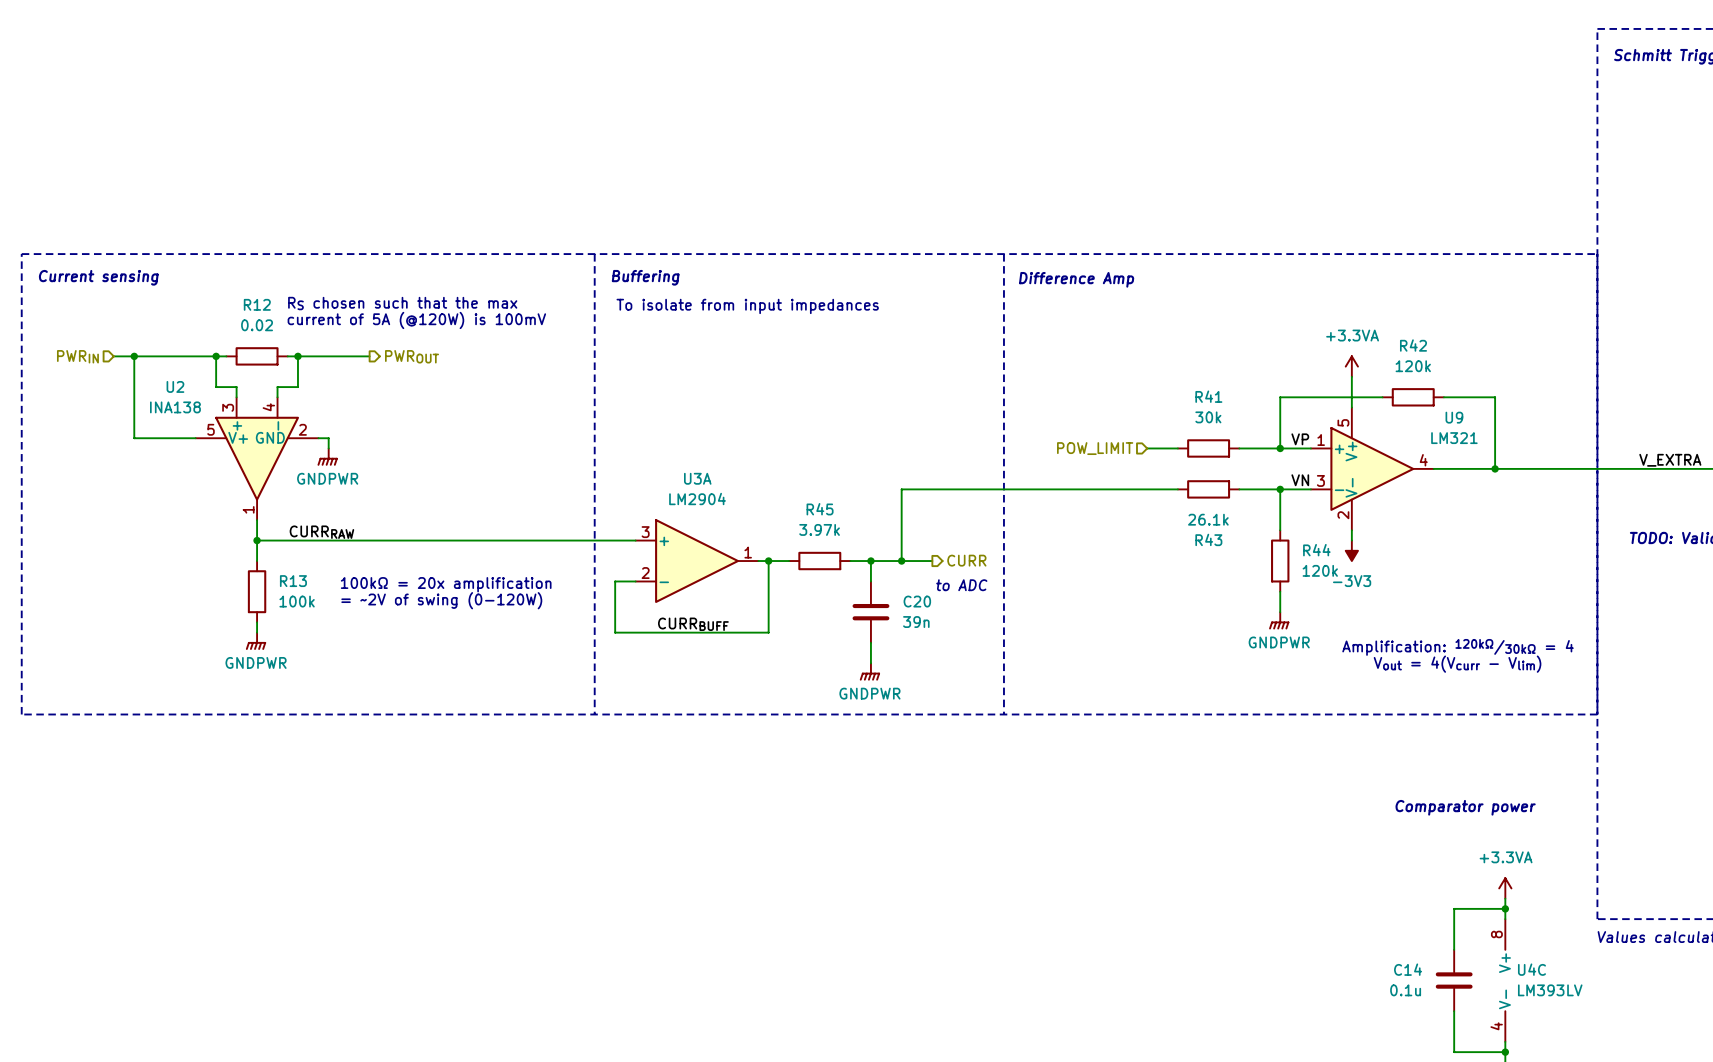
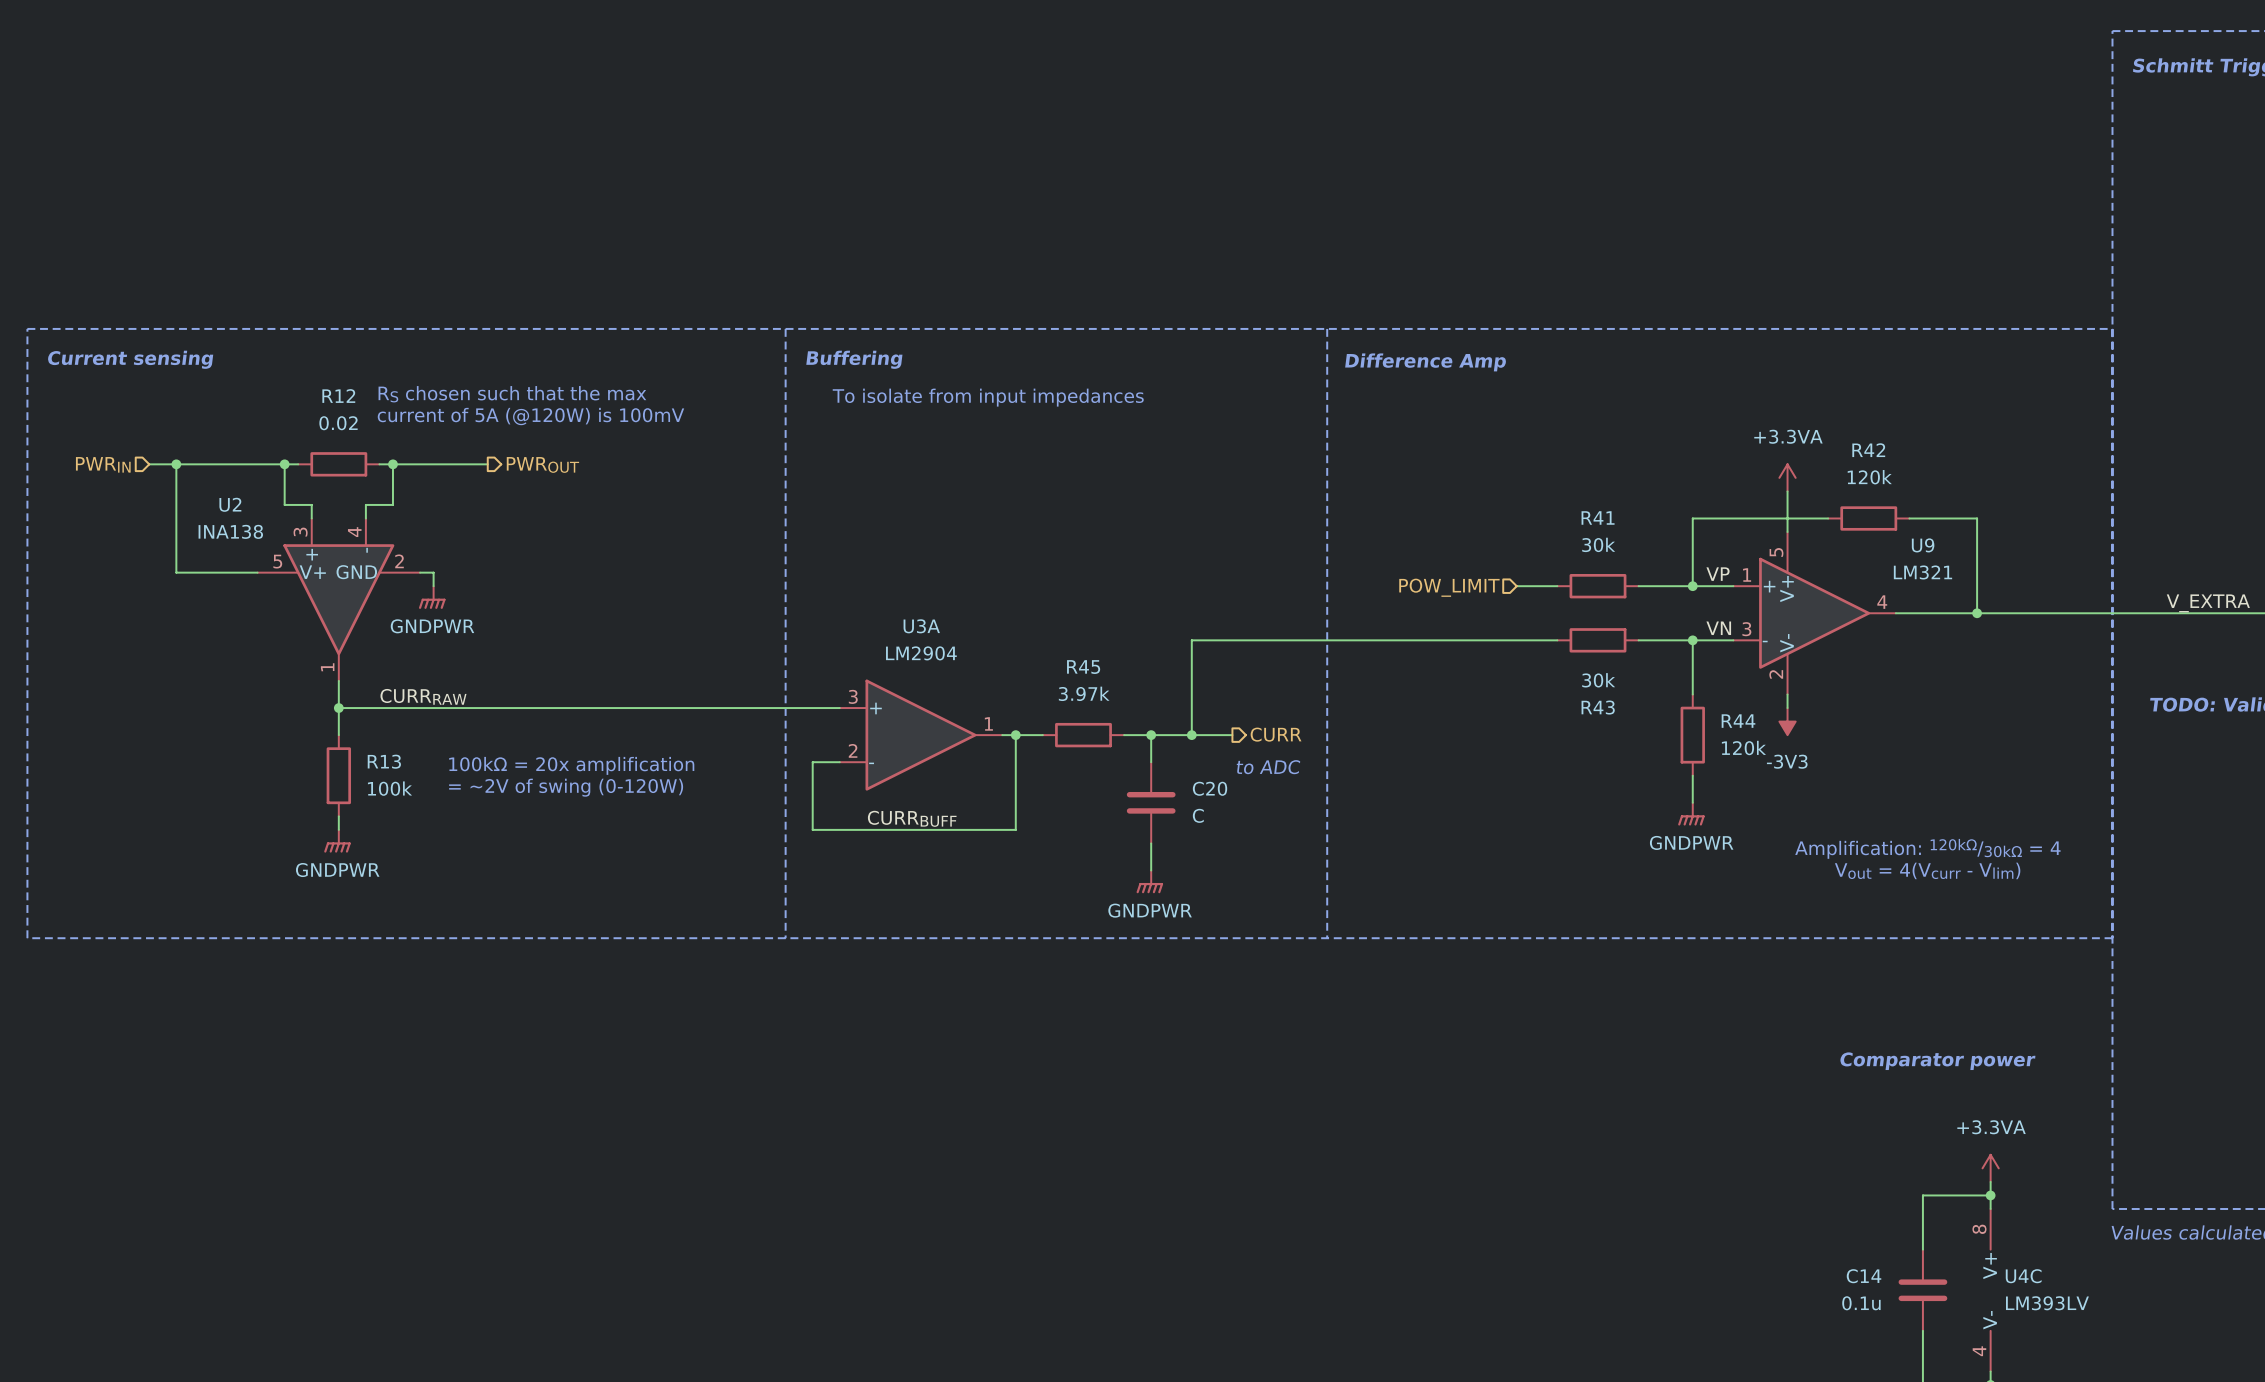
R43 value: 26.1k (1208, 519) -> 30k (1598, 680)
C20 value: 39n (916, 622) -> C (1198, 815)

